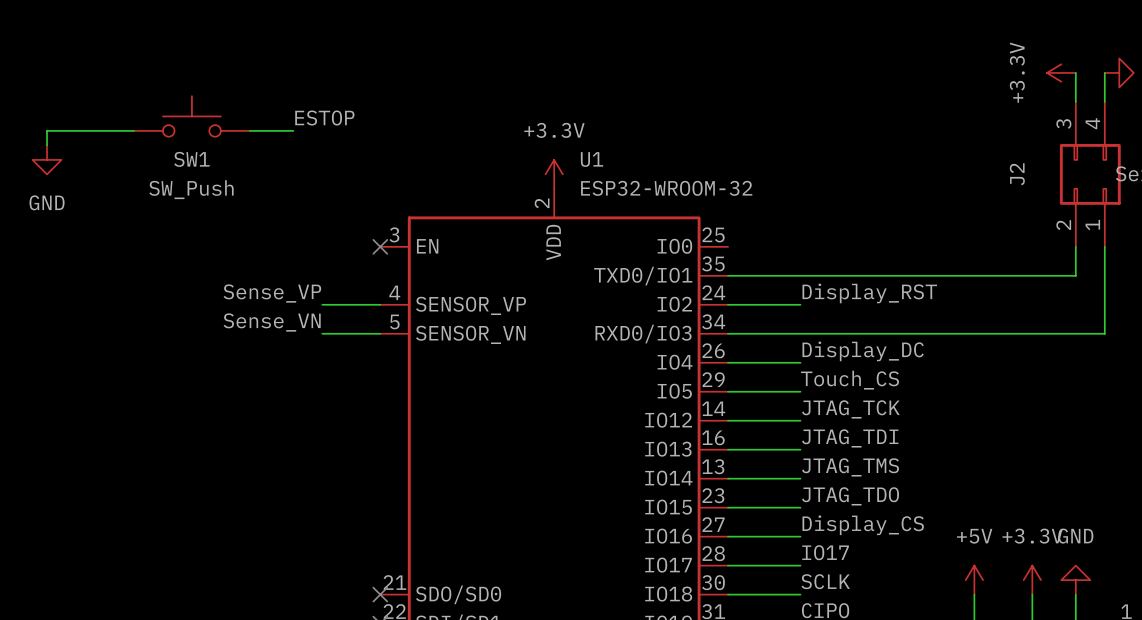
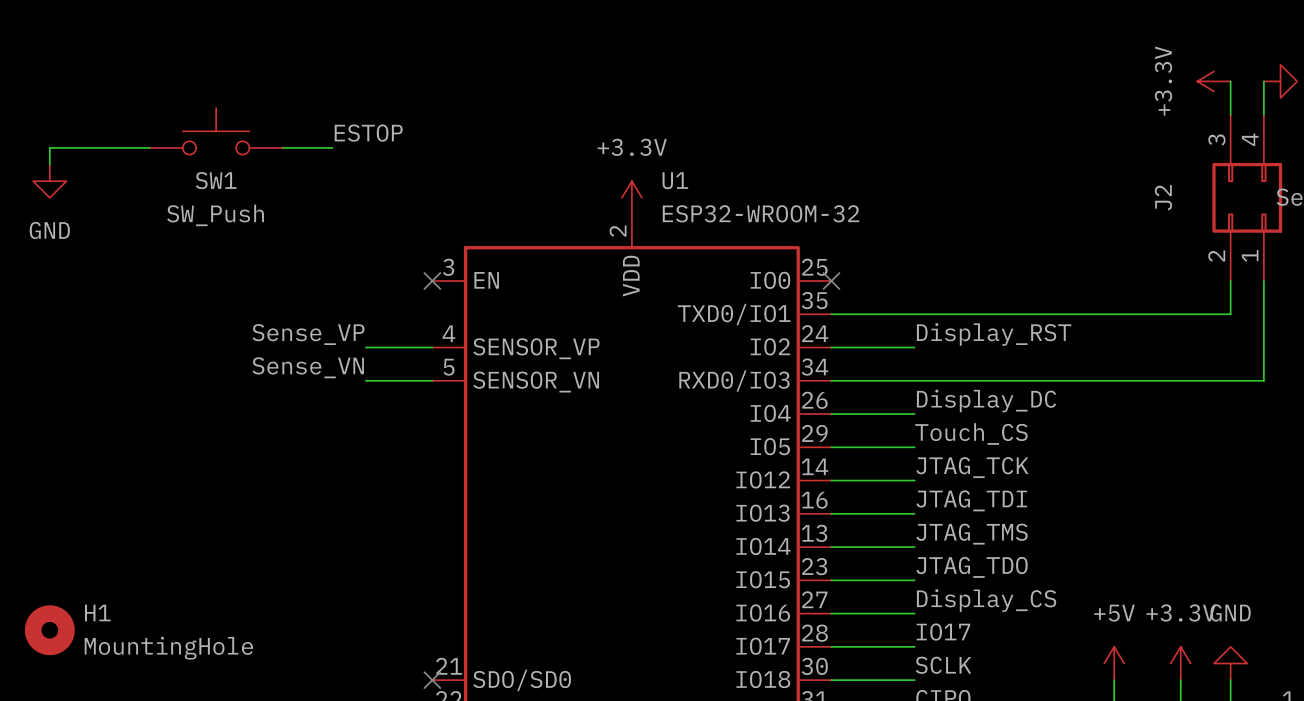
no-connect mark: none -> (831, 280)
H1: none -> MountingHole (49, 630)

